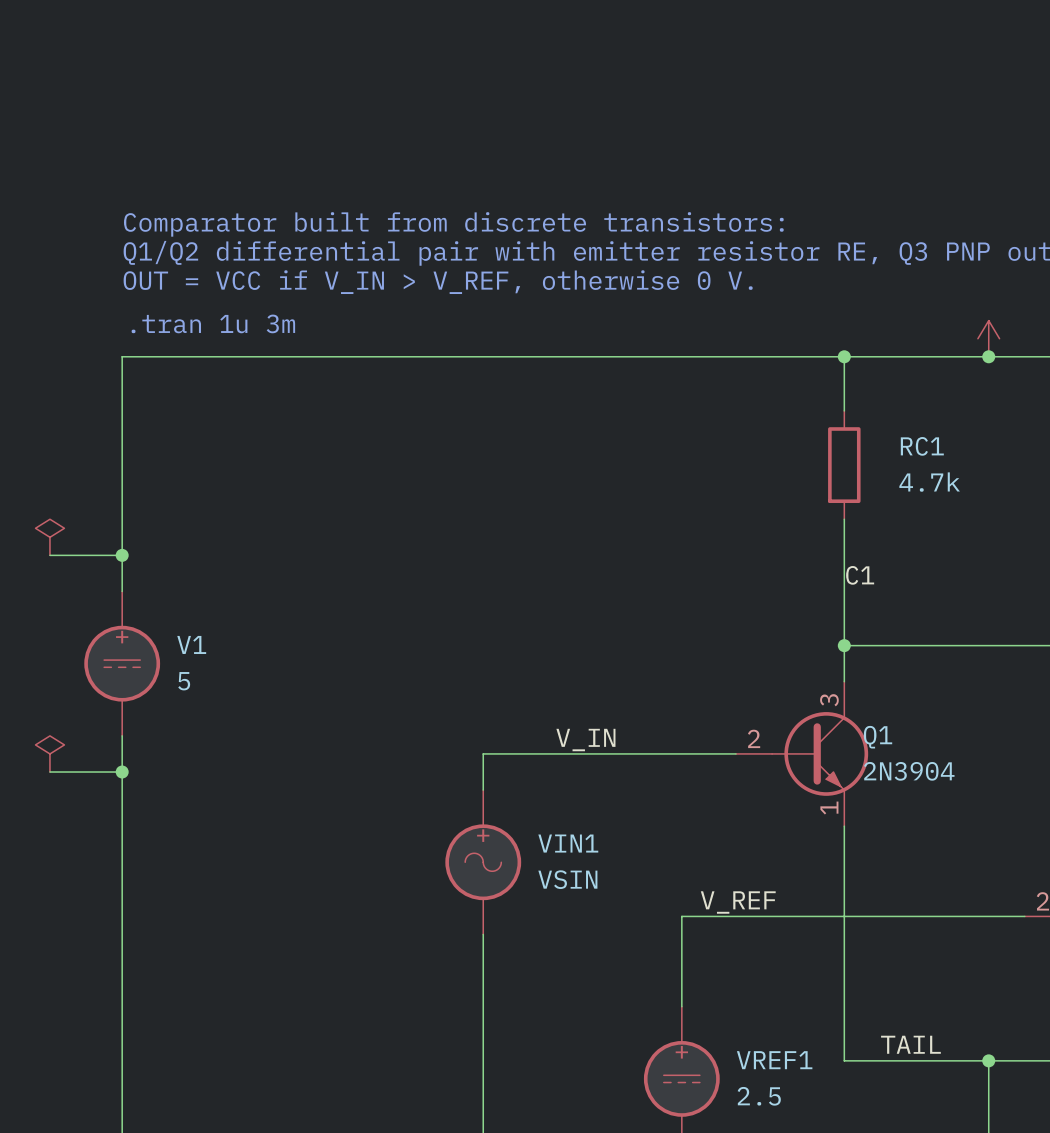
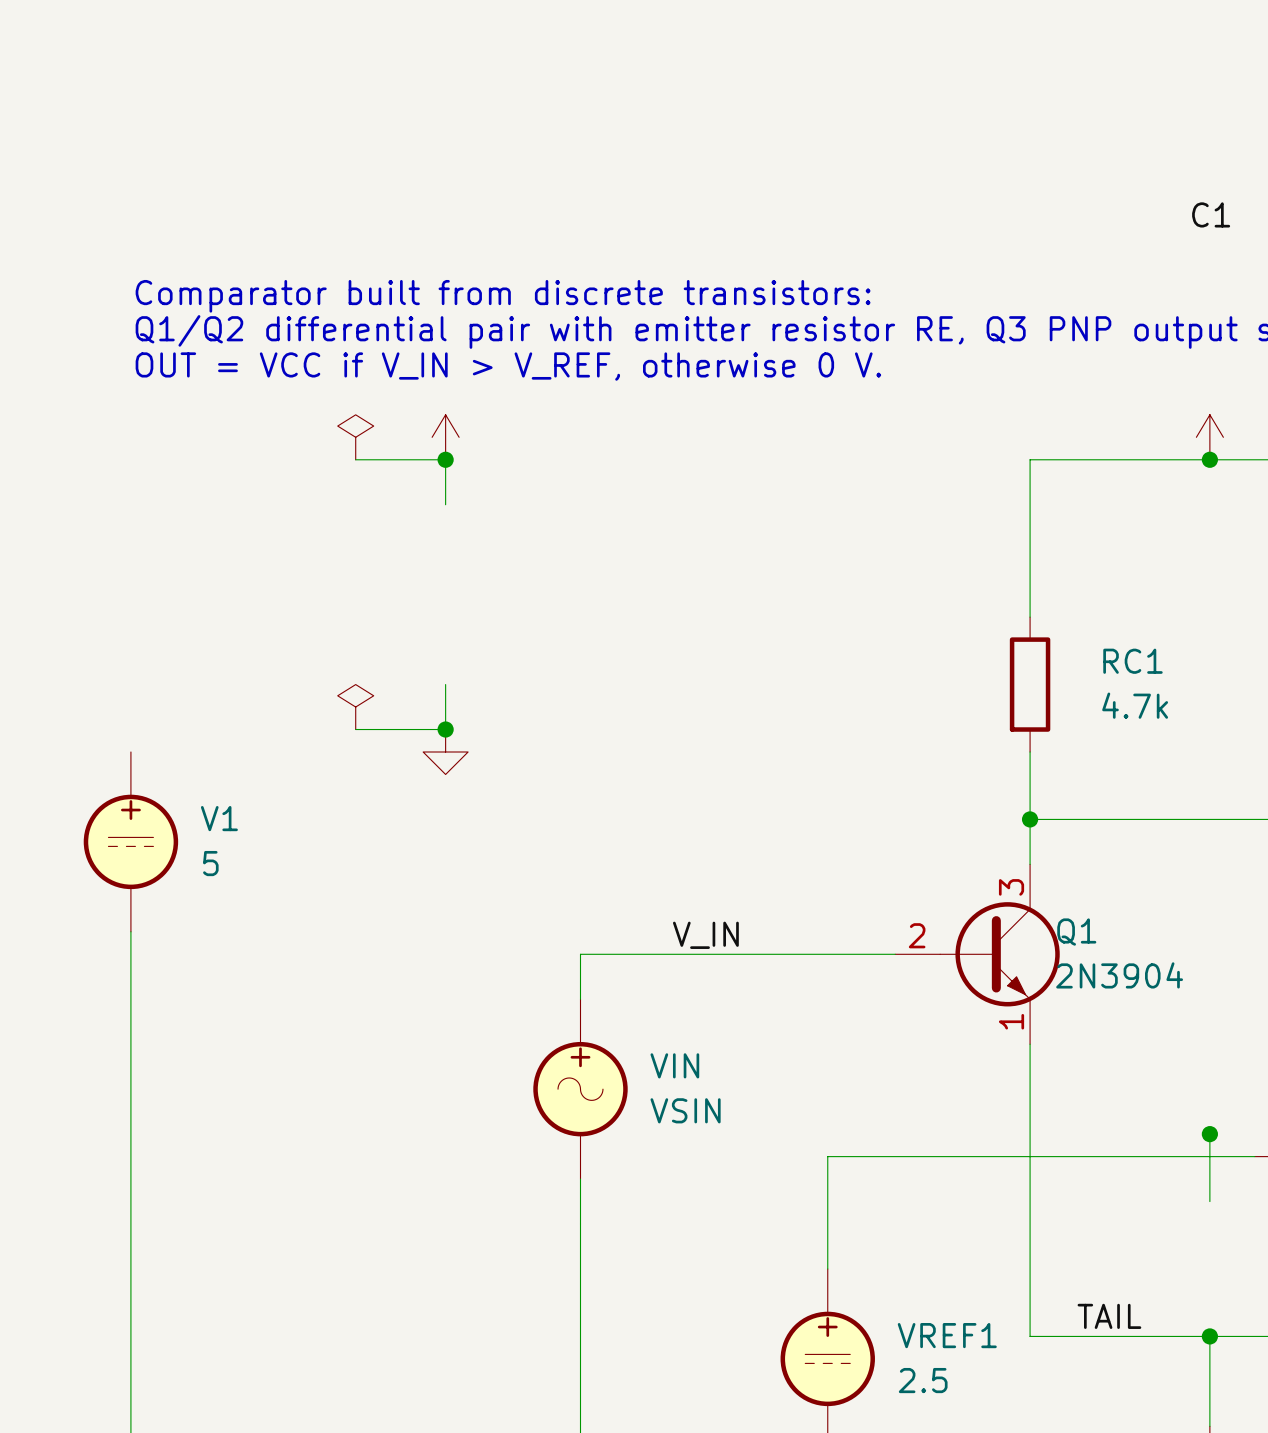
label: none -> C1 (1211, 214)
text: .tran 1u 3m (213, 323) -> none
power symbol: none -> (355, 437)
power symbol: none -> (445, 437)
wire: (302, 356) (122, 356) (122, 591) -> none
wire: (374, 356) (844, 356) -> (445, 459) (445, 504)
junction: none -> (445, 459)
junction: (844, 356) -> none
RC1 position: (844, 465) -> (1030, 684)
wire: (844, 519) (844, 591) -> (1030, 527) (1030, 617)
power symbol: (49, 537) -> none
wire: none -> (445, 684) (445, 729) (355, 729)
wire: (49, 555) (122, 555) -> none
junction: (122, 555) -> none
power symbol: none -> (355, 707)
junction: none -> (445, 729)
label: C1 (860, 575) -> none
power symbol: none -> (445, 751)
power symbol: (49, 753) -> none
wire: (49, 772) (122, 772) -> none
junction: (122, 772) -> none
VIN1 name: VIN1 (568, 843) -> VIN (674, 1065)
wire: none -> (1209, 1134) (1209, 1201)
junction: none -> (1209, 1134)
label: V_REF (738, 902) -> none

